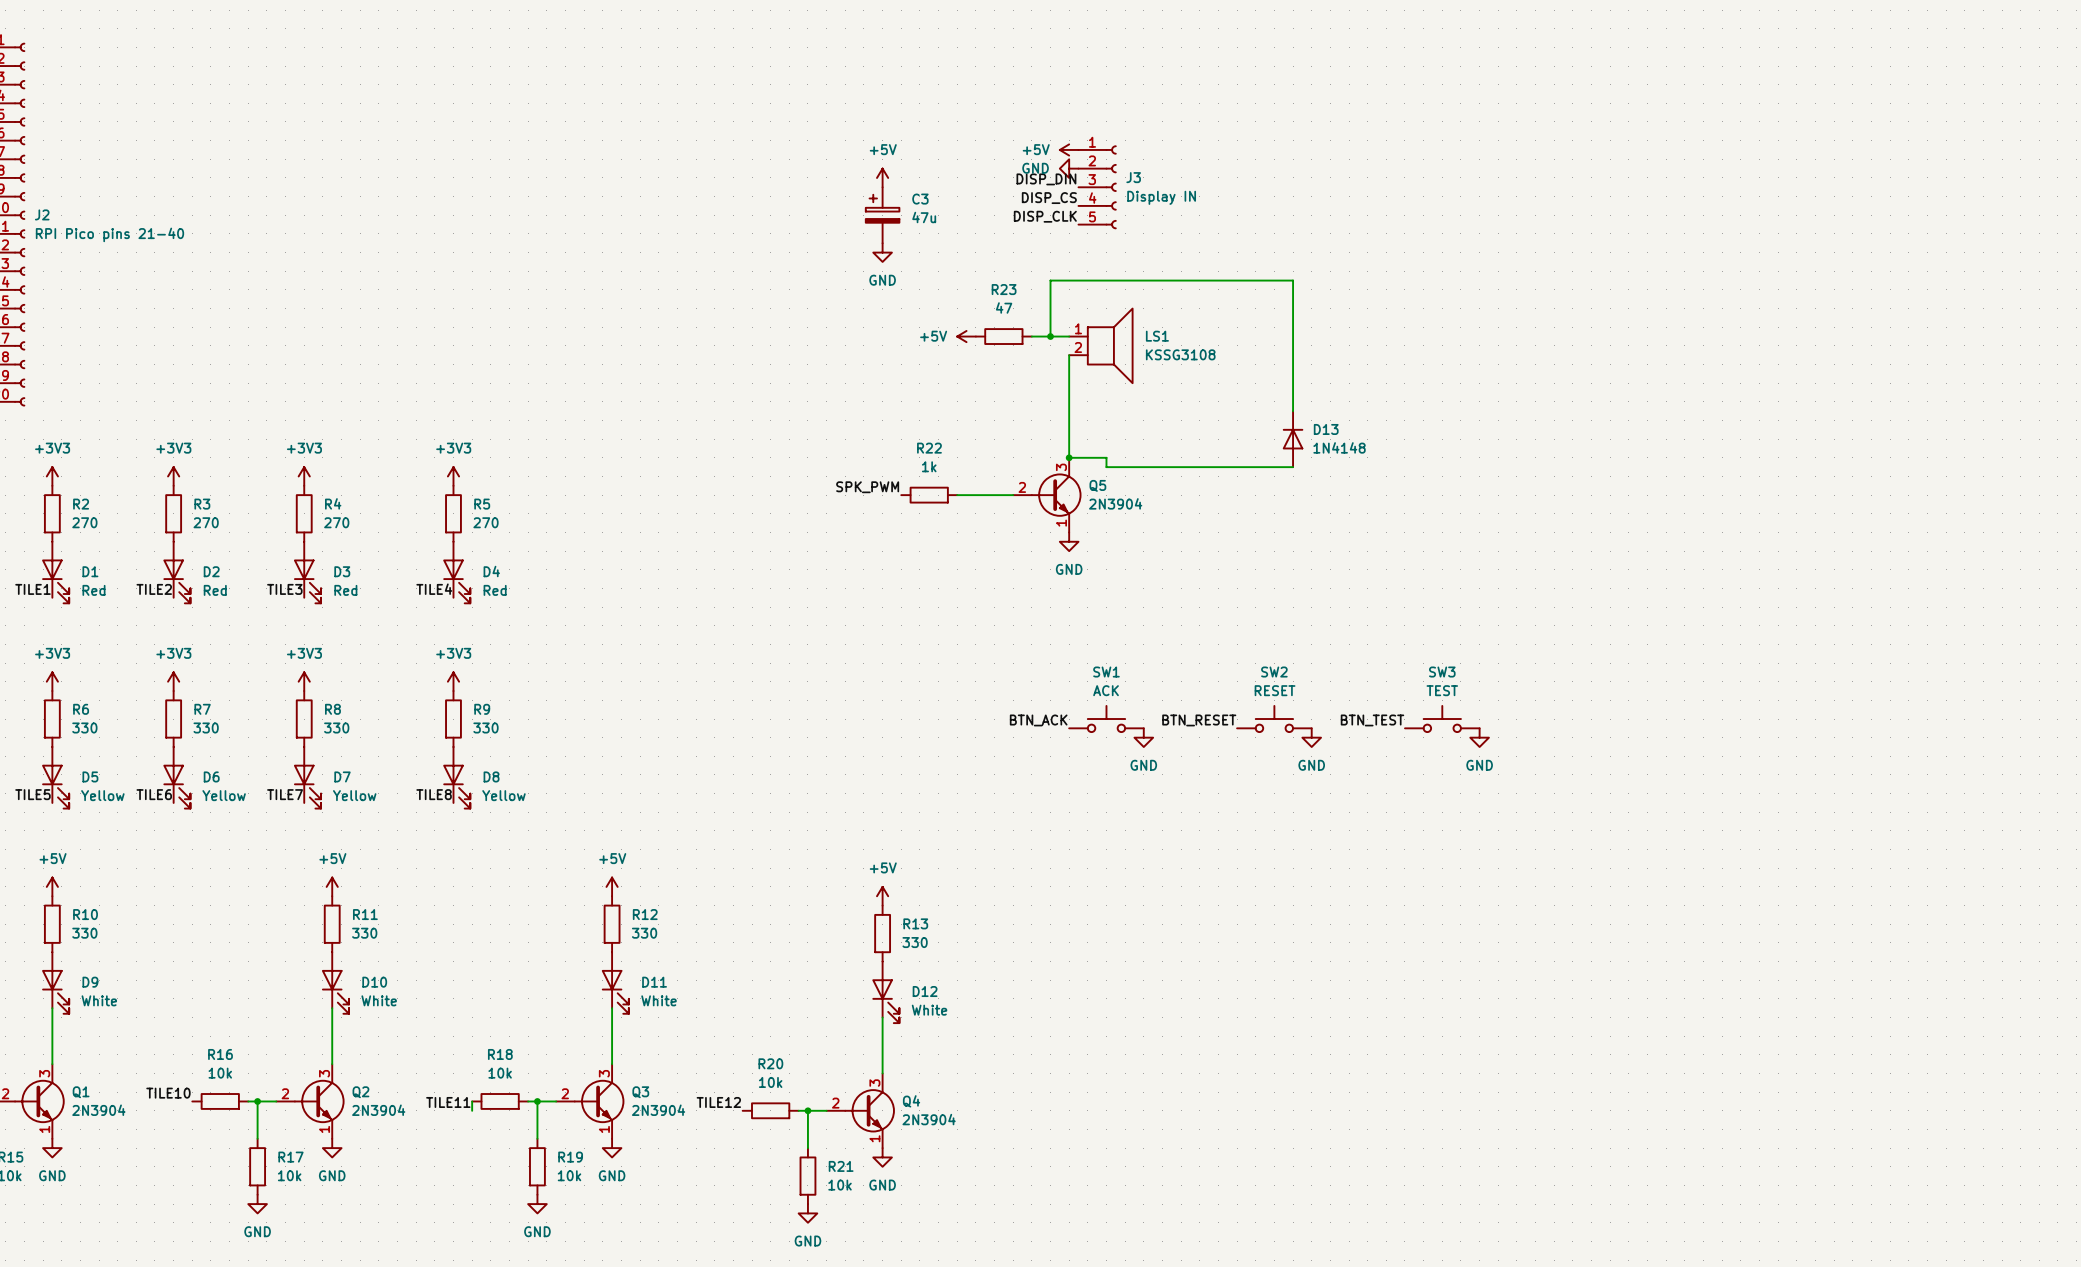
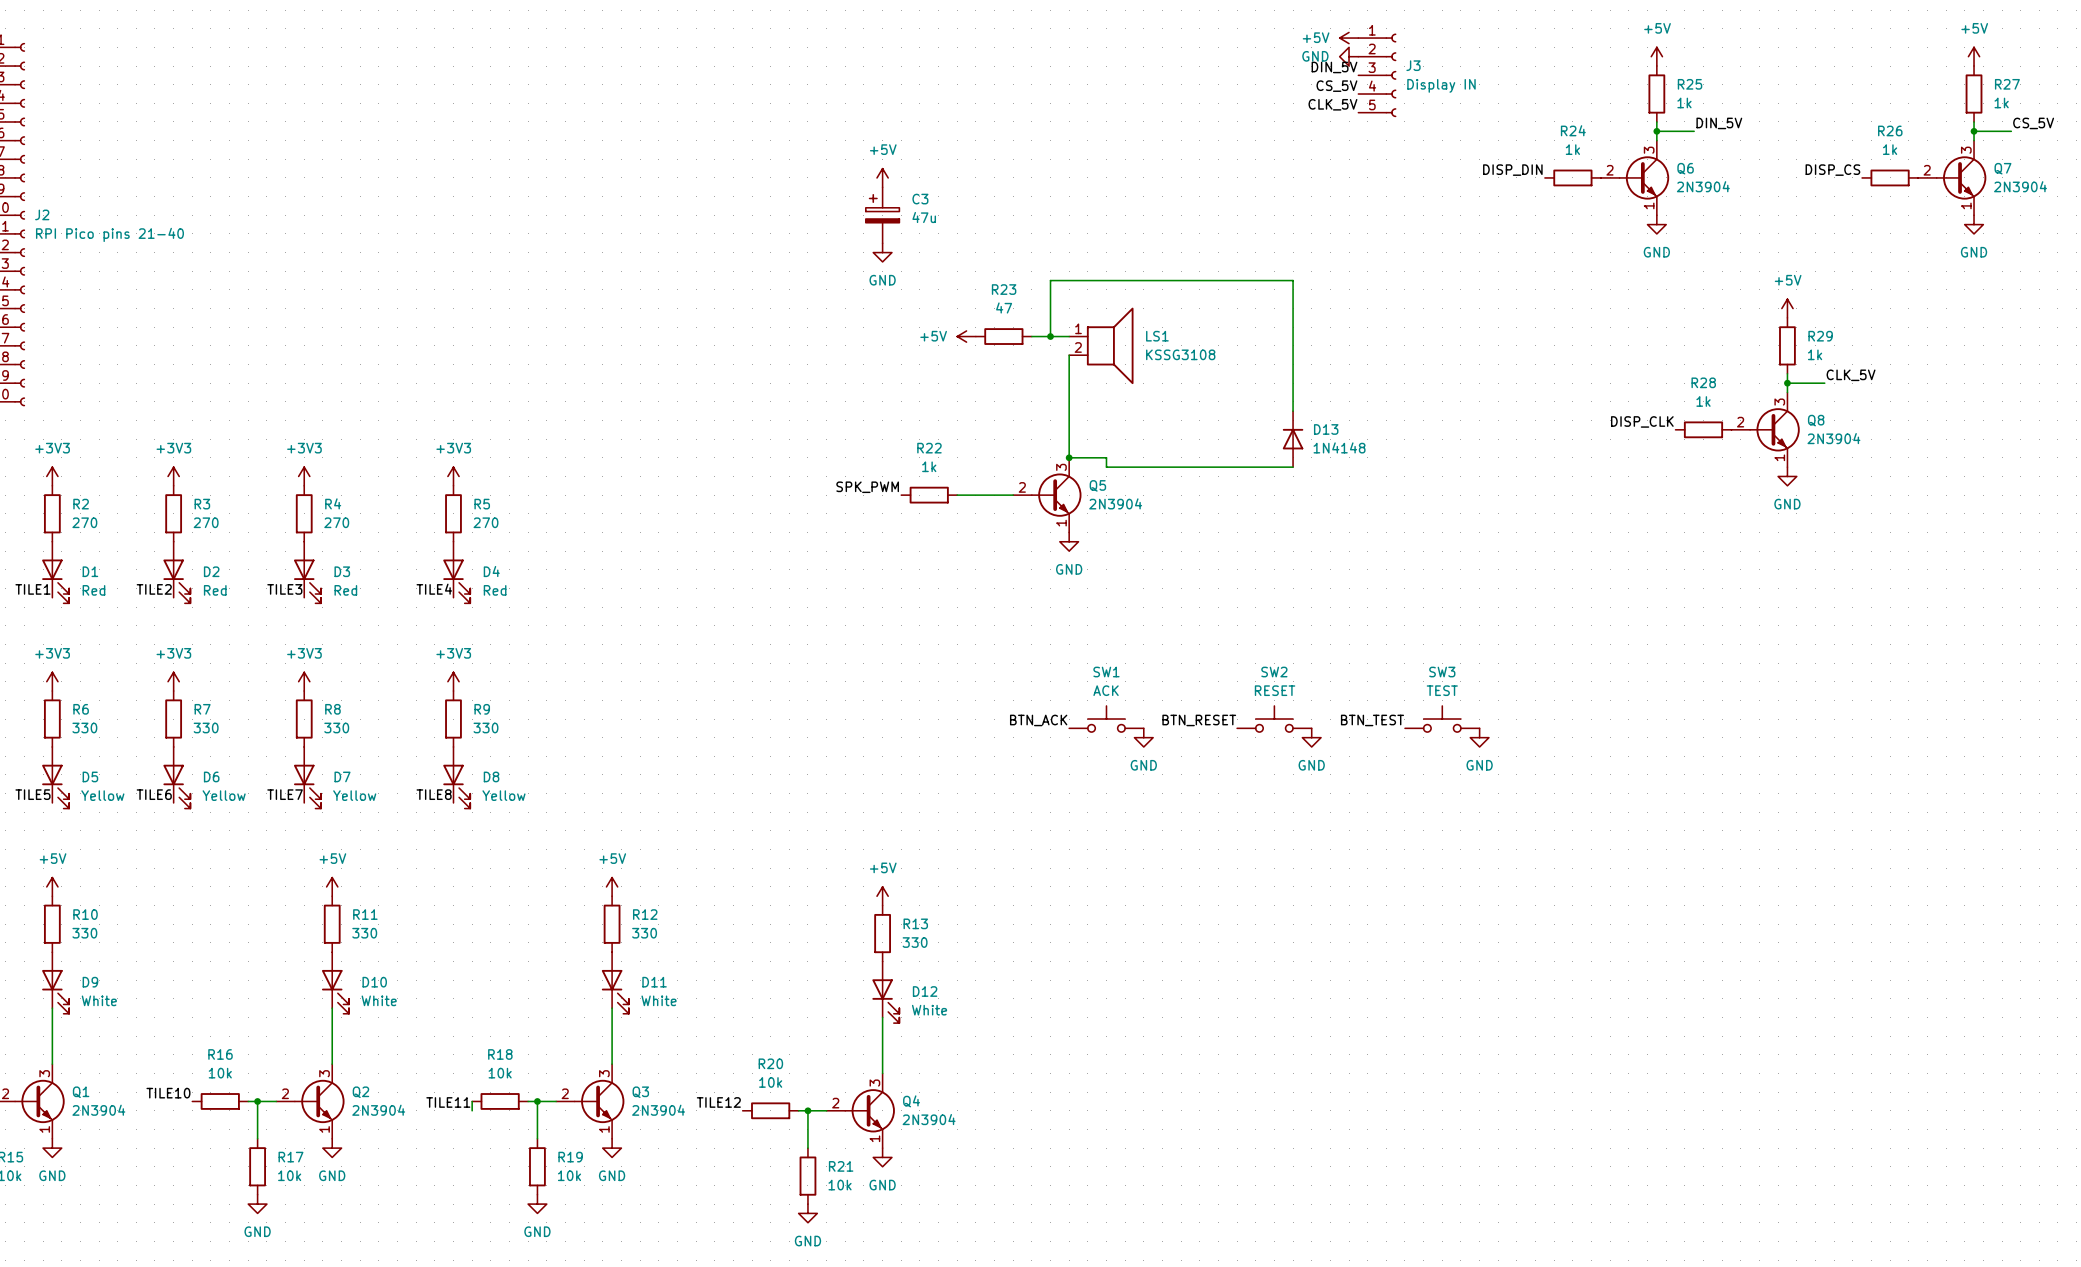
power symbol: none -> +5V (1349, 38)
power symbol: none -> GND (1349, 56)
power symbol: none -> +5V (1656, 56)
power symbol: none -> +5V (1974, 56)
label: none -> DIN_5V (1334, 67)
label: none -> CS_5V (1336, 86)
R25: none -> 1k (1656, 94)
R27: none -> 1k (1974, 94)
label: none -> CLK_5V (1332, 104)
wire: none -> (1656, 121) (1656, 140)
wire: none -> (1974, 121) (1974, 140)
label: none -> DIN_5V (1719, 123)
label: none -> CS_5V (2033, 123)
wire: none -> (1656, 131) (1694, 131)
junction: none -> (1656, 131)
wire: none -> (1974, 131) (2011, 131)
junction: none -> (1974, 131)
power symbol: +5V (1069, 149) -> none
power symbol: GND (1069, 168) -> none
label: none -> DISP_DIN (1512, 170)
label: none -> DISP_CS (1832, 170)
R24: none -> 1k (1572, 177)
Q6: none -> 2N3904 (1635, 177)
R26: none -> 1k (1890, 177)
Q7: none -> 2N3904 (1952, 177)
label: DISP_DIN (1046, 179) -> none
J3 position: (1097, 187) -> (1377, 75)
label: DISP_CS (1049, 198) -> none
label: DISP_CLK (1045, 216) -> none
power symbol: none -> GND (1656, 224)
power symbol: none -> GND (1974, 224)
power symbol: none -> +5V (1787, 308)
R29: none -> 1k (1787, 345)
wire: none -> (1787, 373) (1787, 392)
label: none -> CLK_5V (1851, 375)
wire: none -> (1787, 383) (1824, 383)
junction: none -> (1787, 383)
label: none -> DISP_CLK (1642, 421)
R28: none -> 1k (1703, 429)
Q8: none -> 2N3904 (1765, 429)
power symbol: none -> GND (1787, 476)

